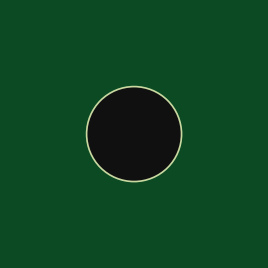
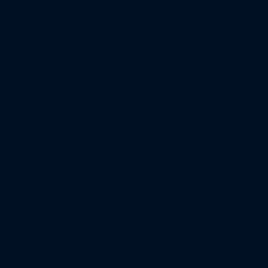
part: (134, 134) -> none

